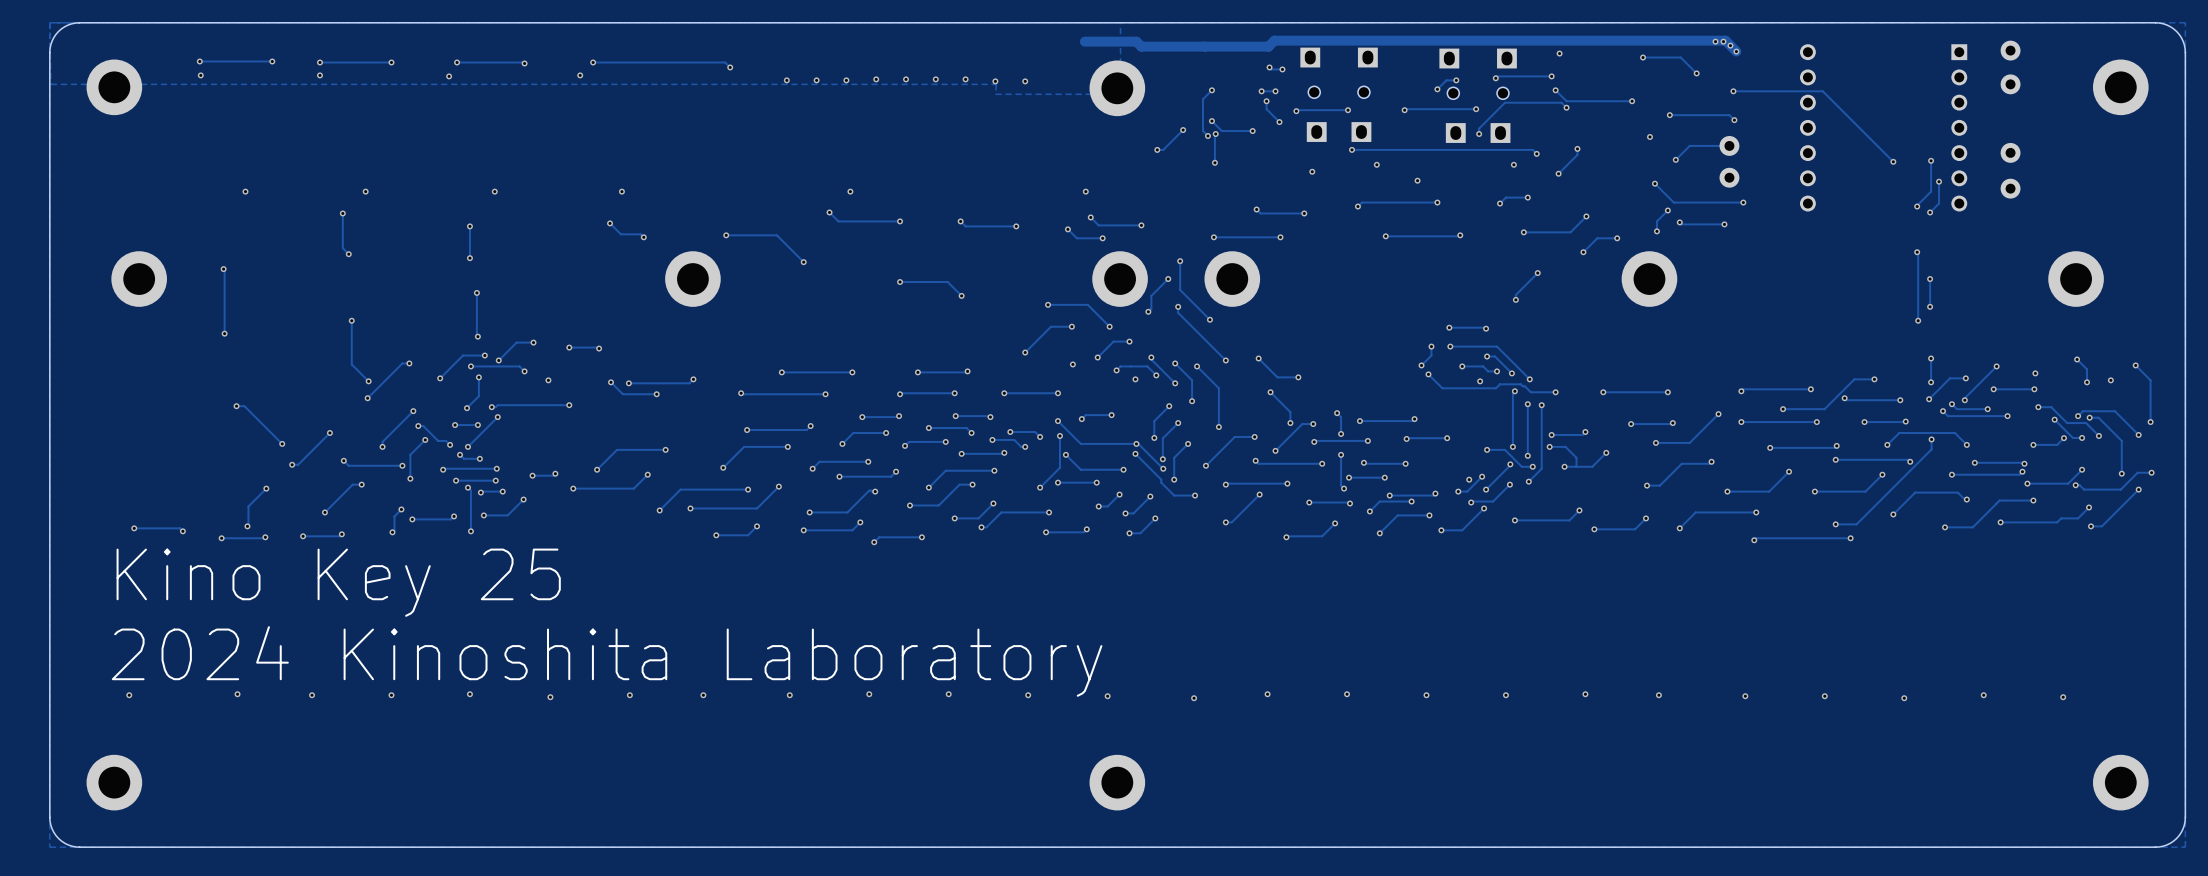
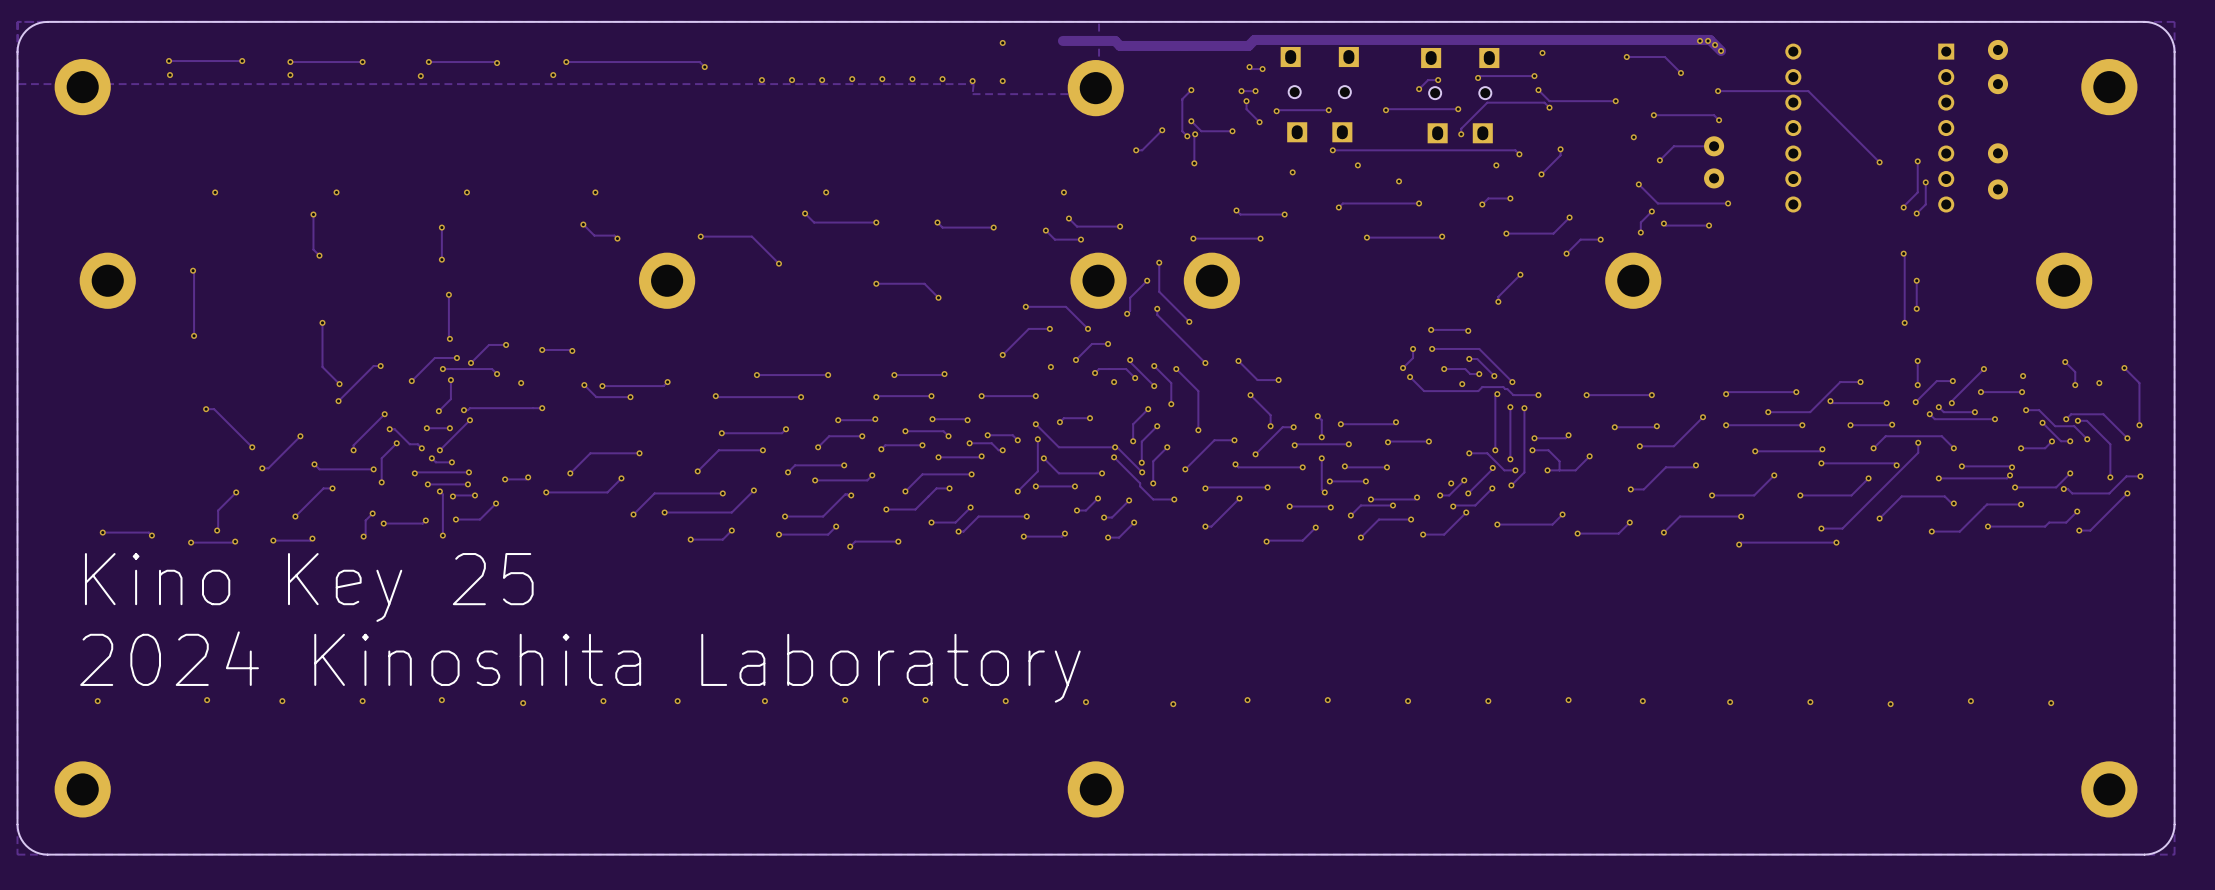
via: none -> (1002, 42)

